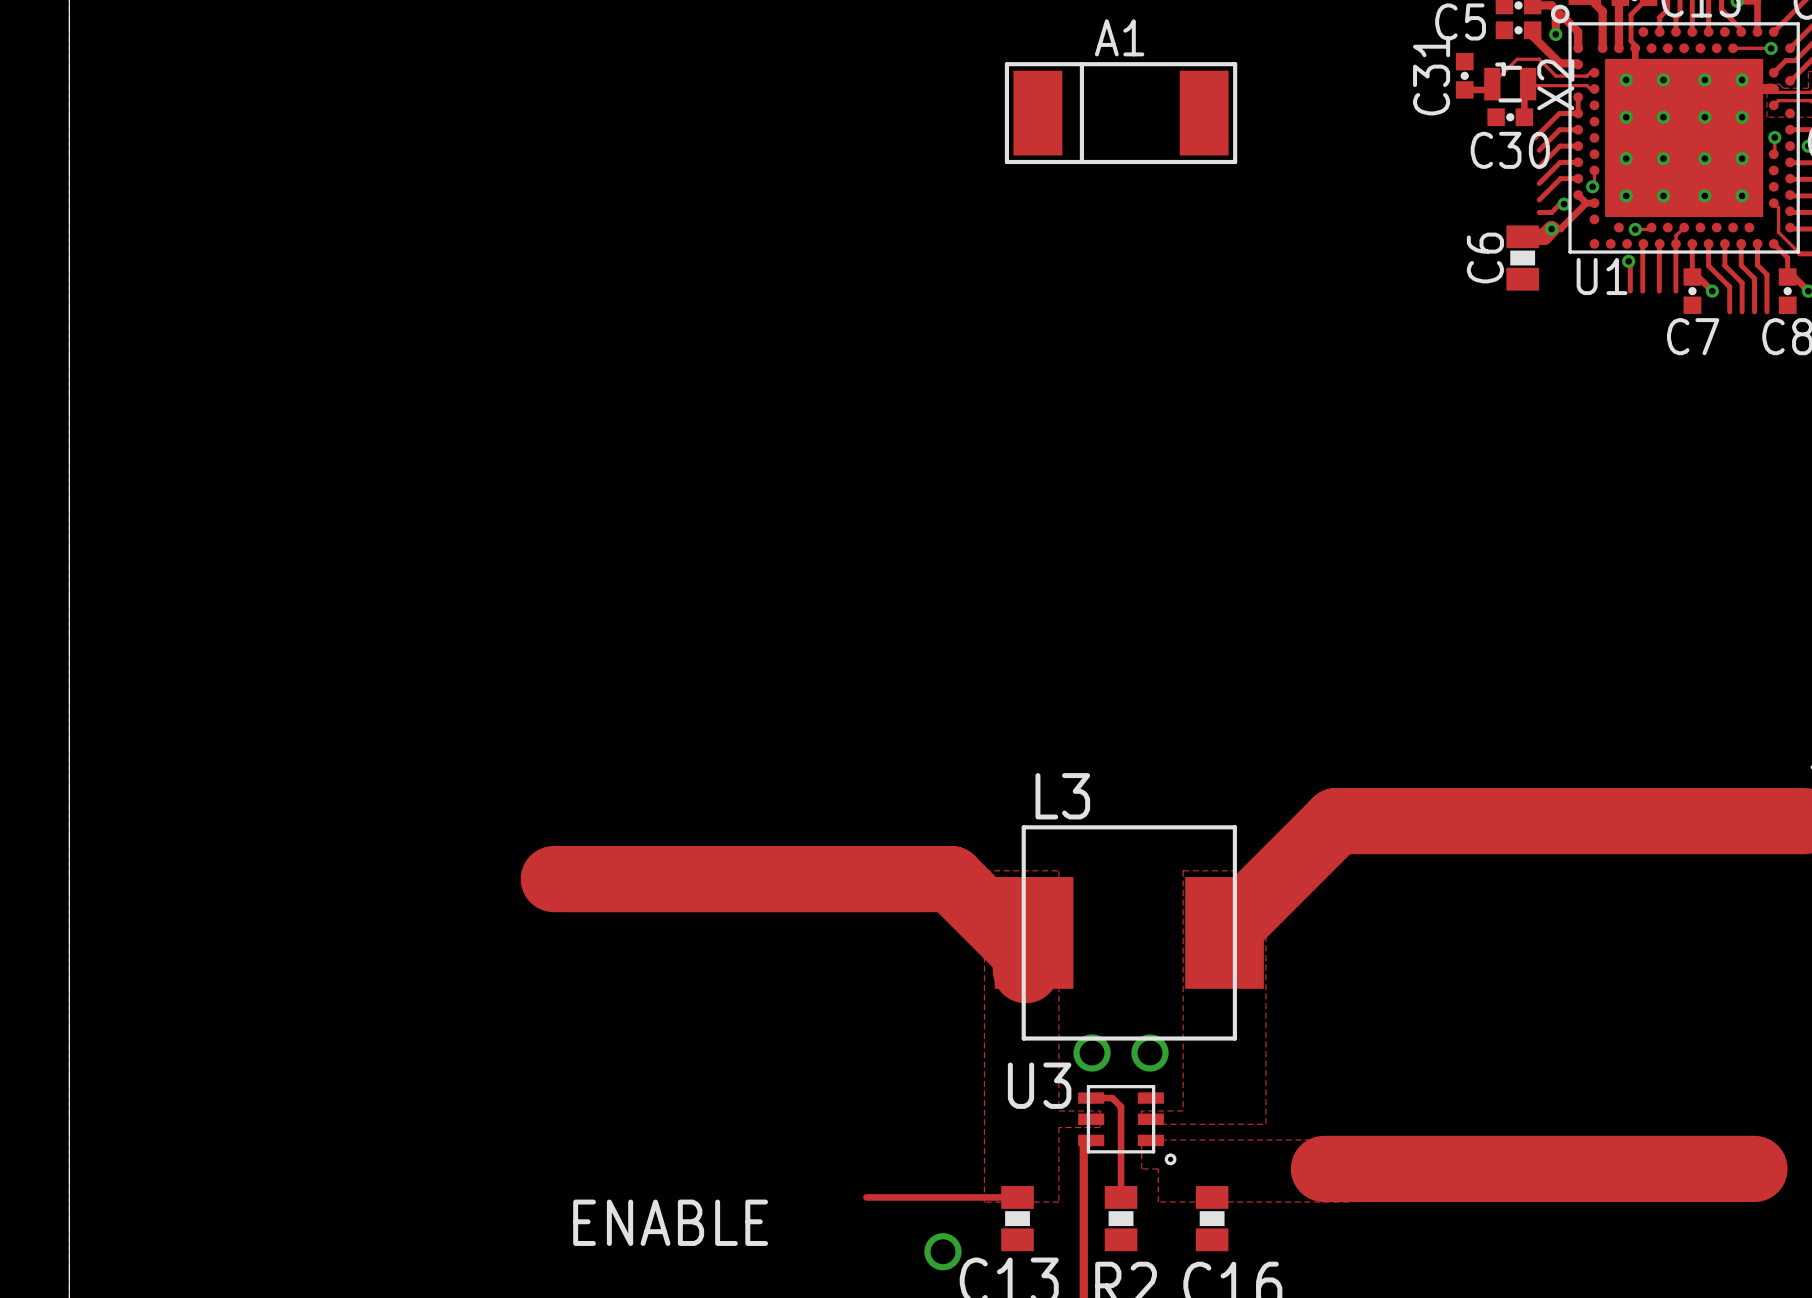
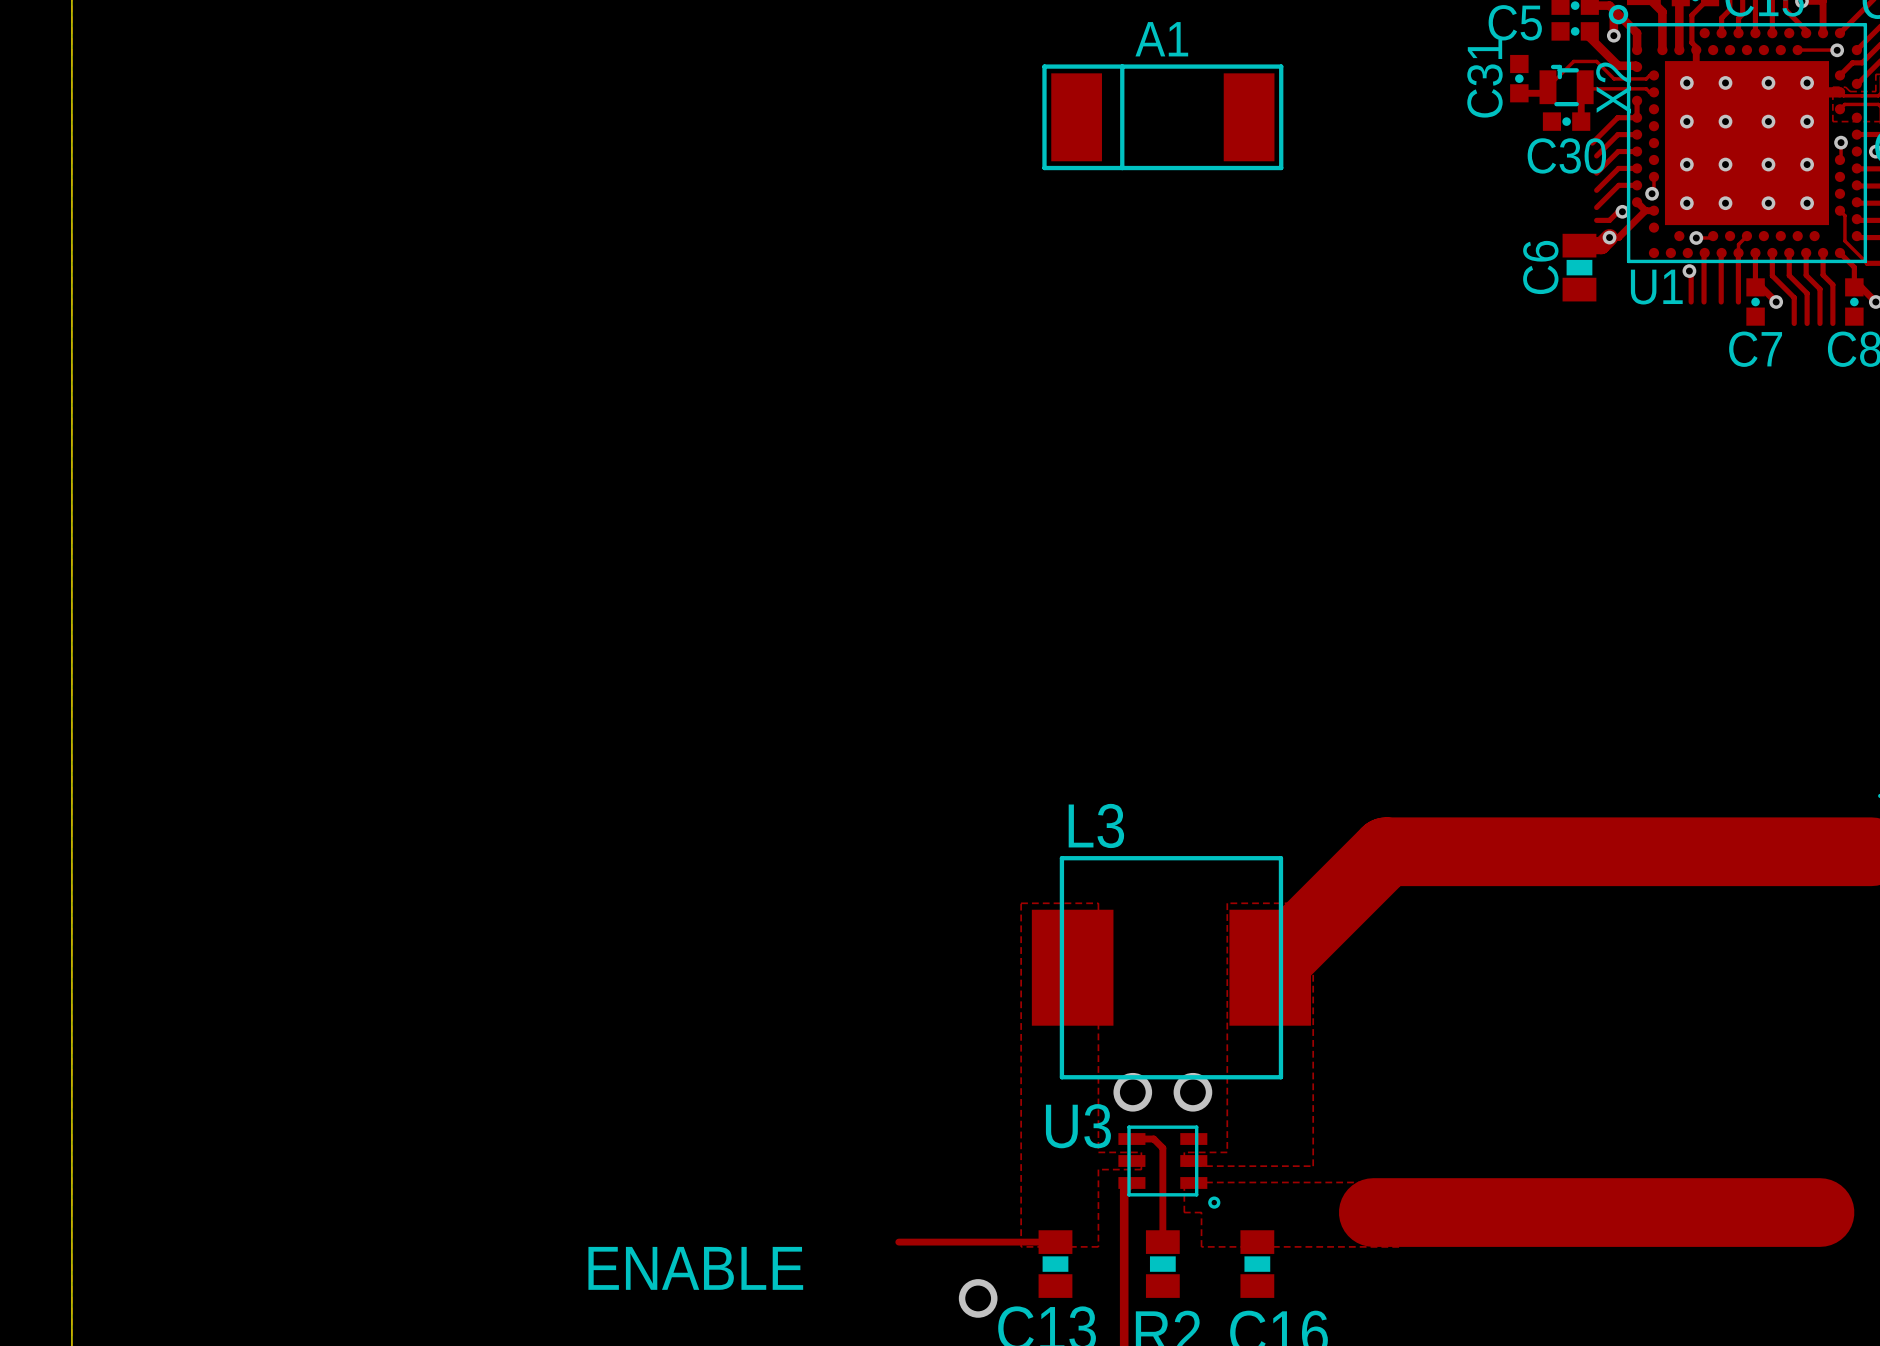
track: (553, 879) (951, 879) (1025, 953) (1025, 970) -> none

